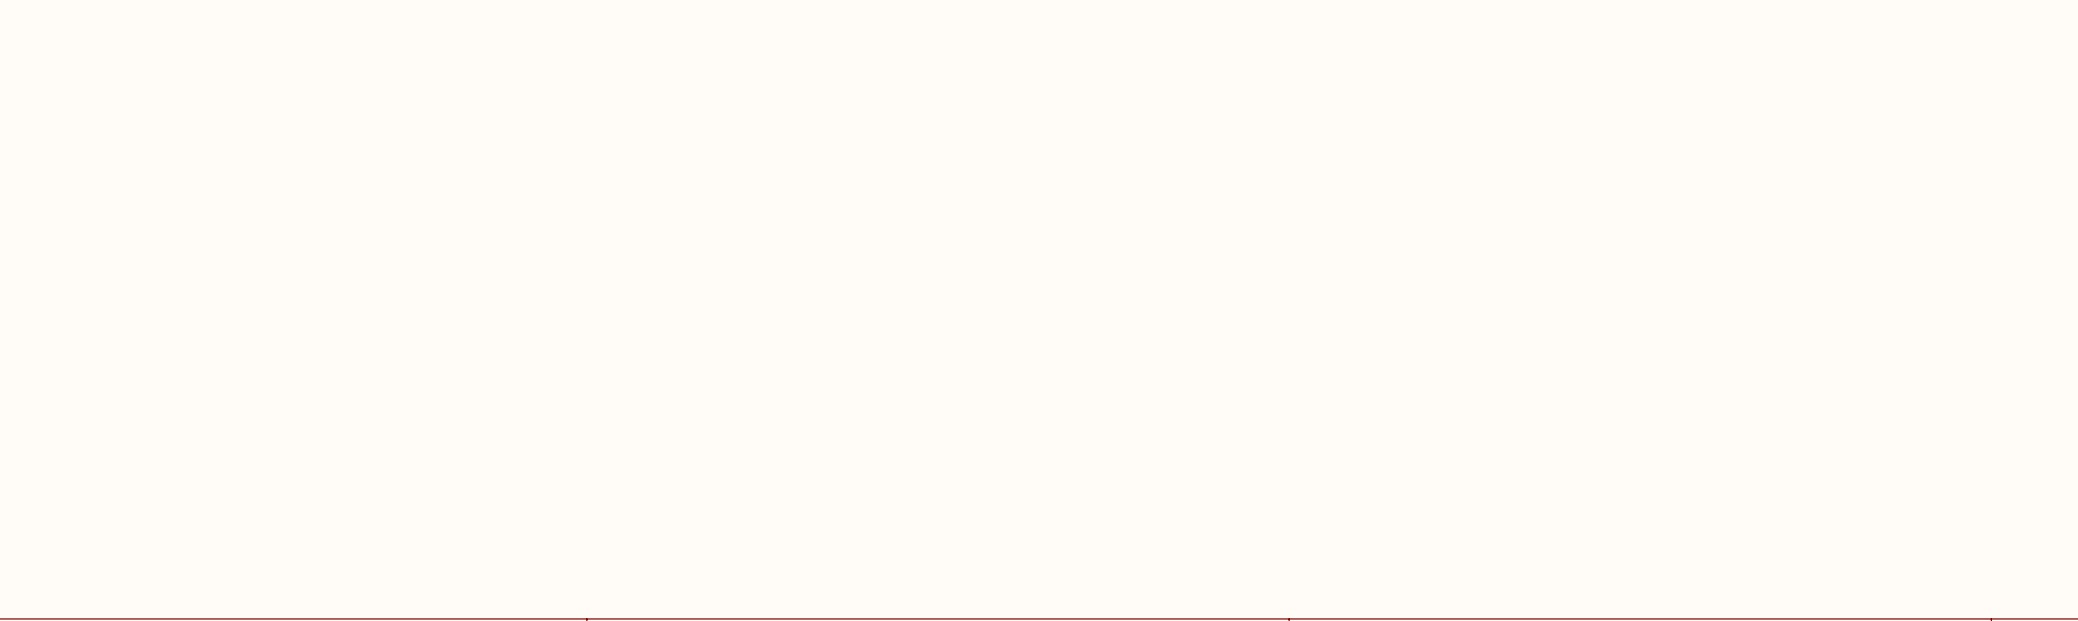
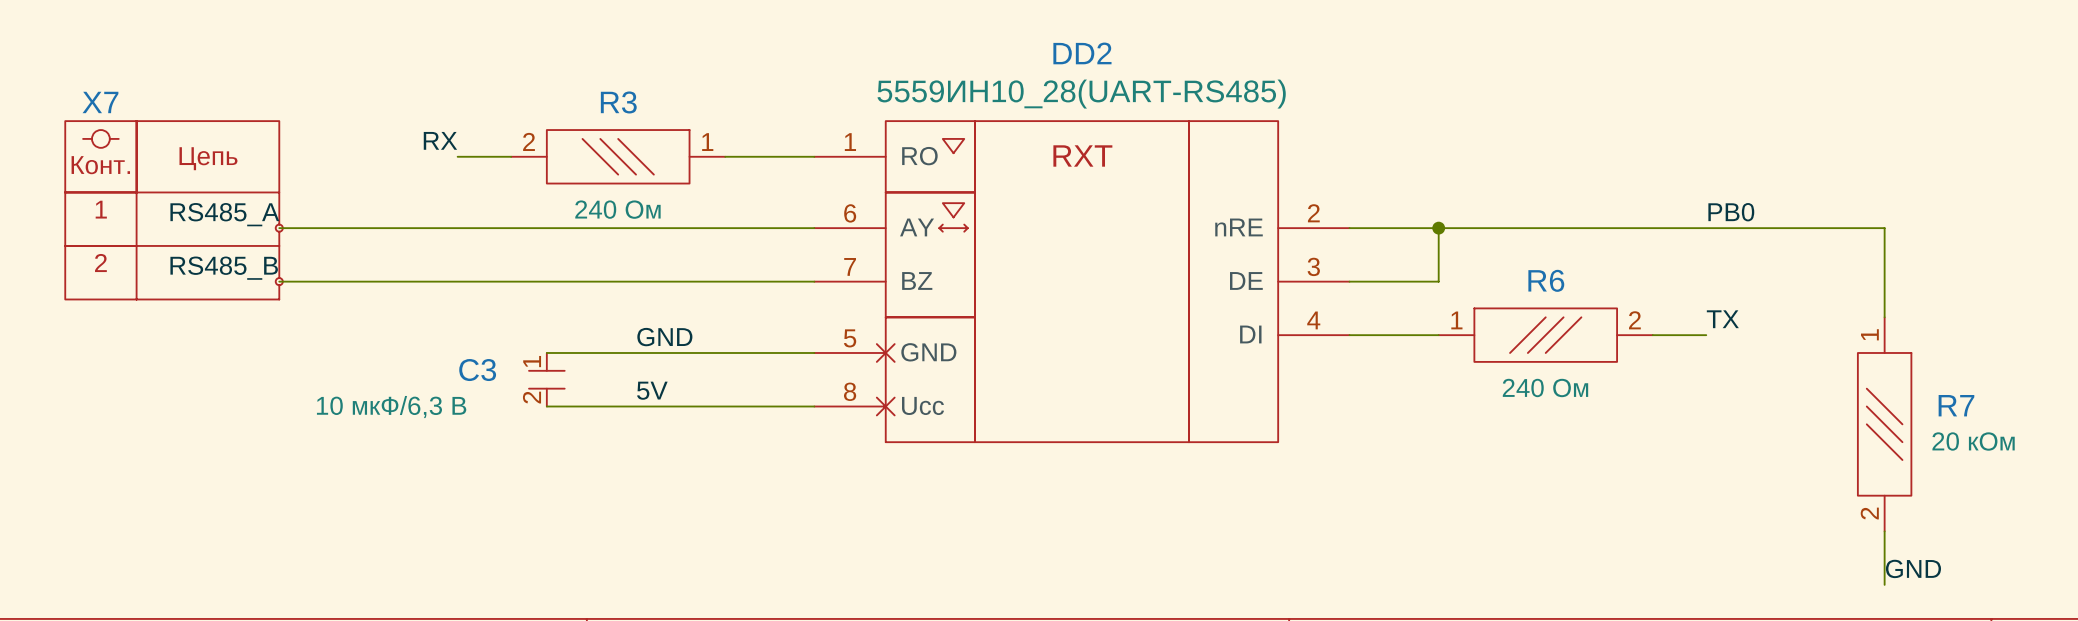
label: none -> RX (440, 140)
wire: none -> (457, 156) (511, 156)
R3: none -> (618, 156)
wire: none -> (725, 156) (814, 156)
X7: none -> (174, 210)
label: none -> RS485_A (224, 214)
label: none -> PB0 (1731, 212)
wire: none -> (279, 228) (814, 228)
wire: none -> (1349, 228) (1884, 228) (1884, 317)
wire: none -> (1438, 228) (1438, 281) (1349, 281)
junction: none -> (1438, 228)
label: none -> RS485_B (224, 268)
wire: none -> (279, 281) (814, 281)
DD2: none -> 5559ИН10_28(UART-RS485) (1081, 281)
label: none -> TX (1722, 319)
wire: none -> (1349, 335) (1438, 335)
R6: none -> (1545, 335)
wire: none -> (1652, 335) (1706, 335)
label: none -> GND (664, 337)
wire: none -> (546, 352) (814, 352)
C3: none -> (546, 379)
label: none -> 5V (652, 390)
wire: none -> (546, 406) (814, 406)
R7: none -> (1884, 424)
wire: none -> (1884, 531) (1884, 584)
label: none -> GND (1913, 568)

